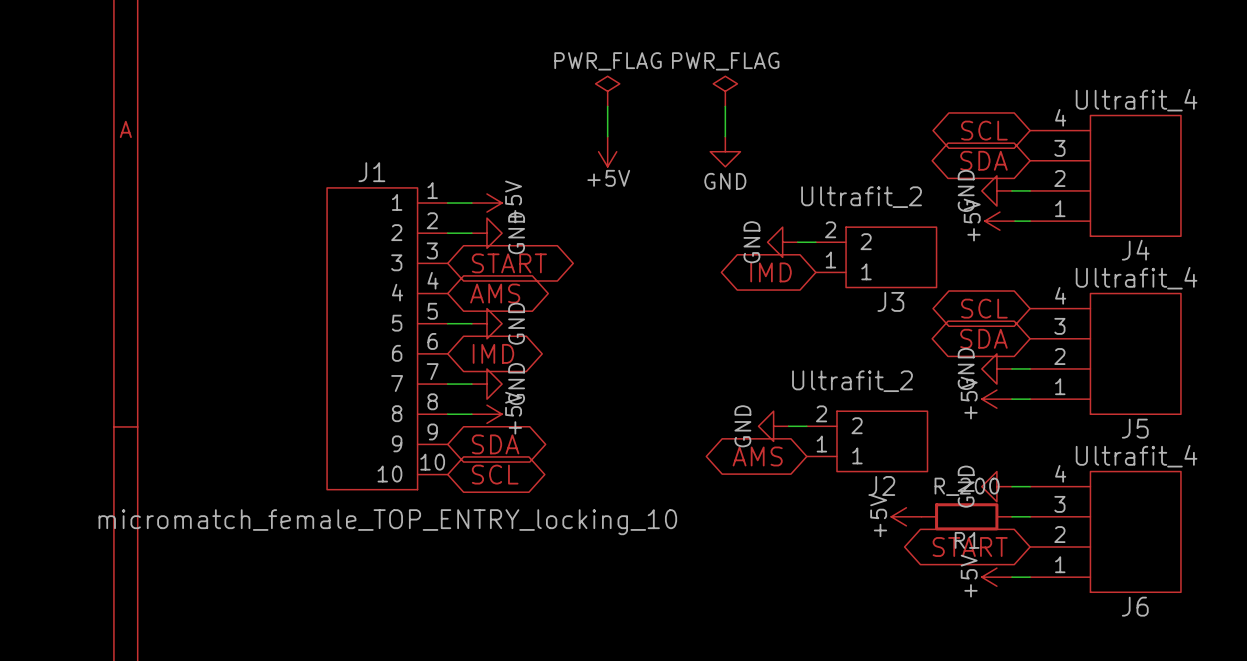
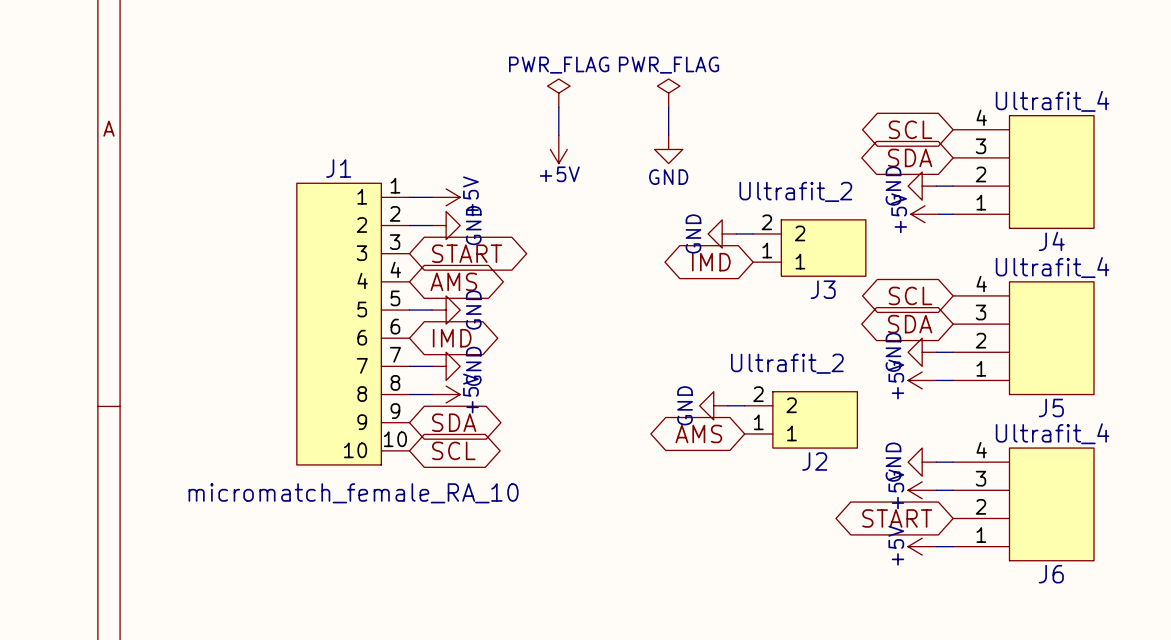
power symbol position: +5V (906, 516) -> +5V (922, 490)
R1: R_200 (966, 516) -> none
J1 value: micromatch_female_TOP_ENTRY_locking_10 (387, 522) -> micromatch_female_RA_10 (353, 493)

